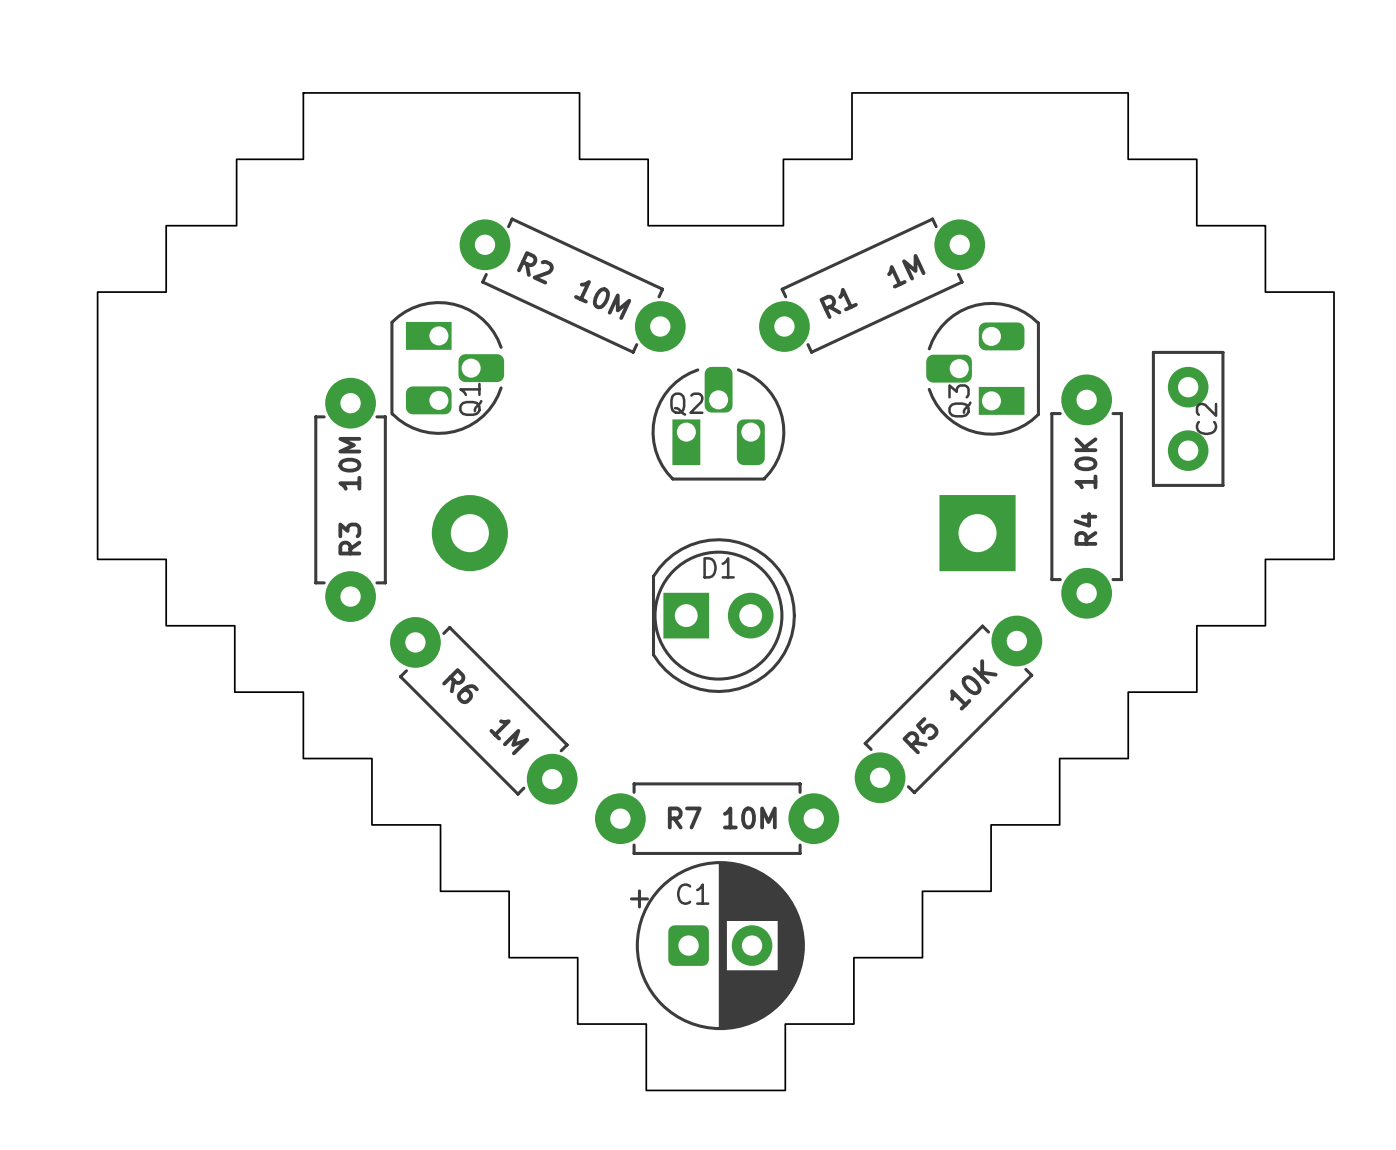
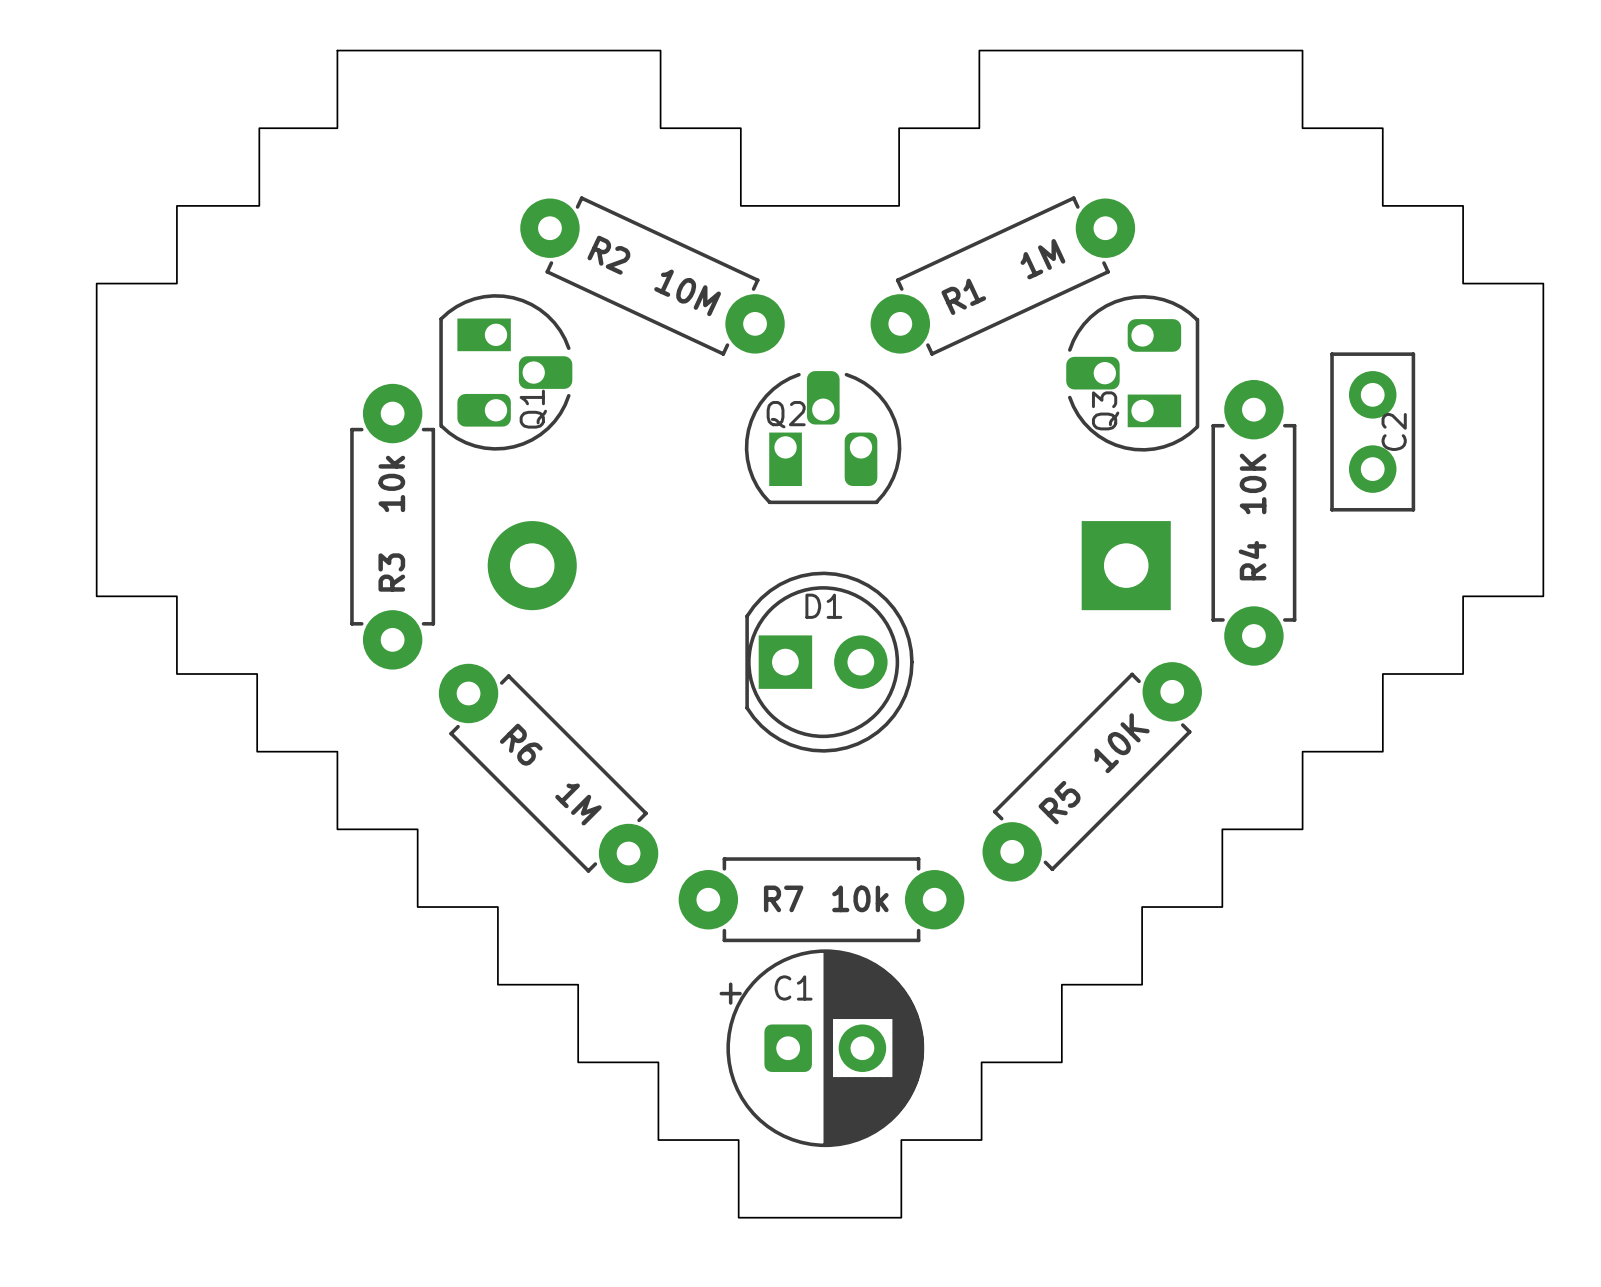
R3 value: 10M (349, 463) -> 10k (391, 483)
R7 value: 10M (749, 817) -> 10k (860, 898)

